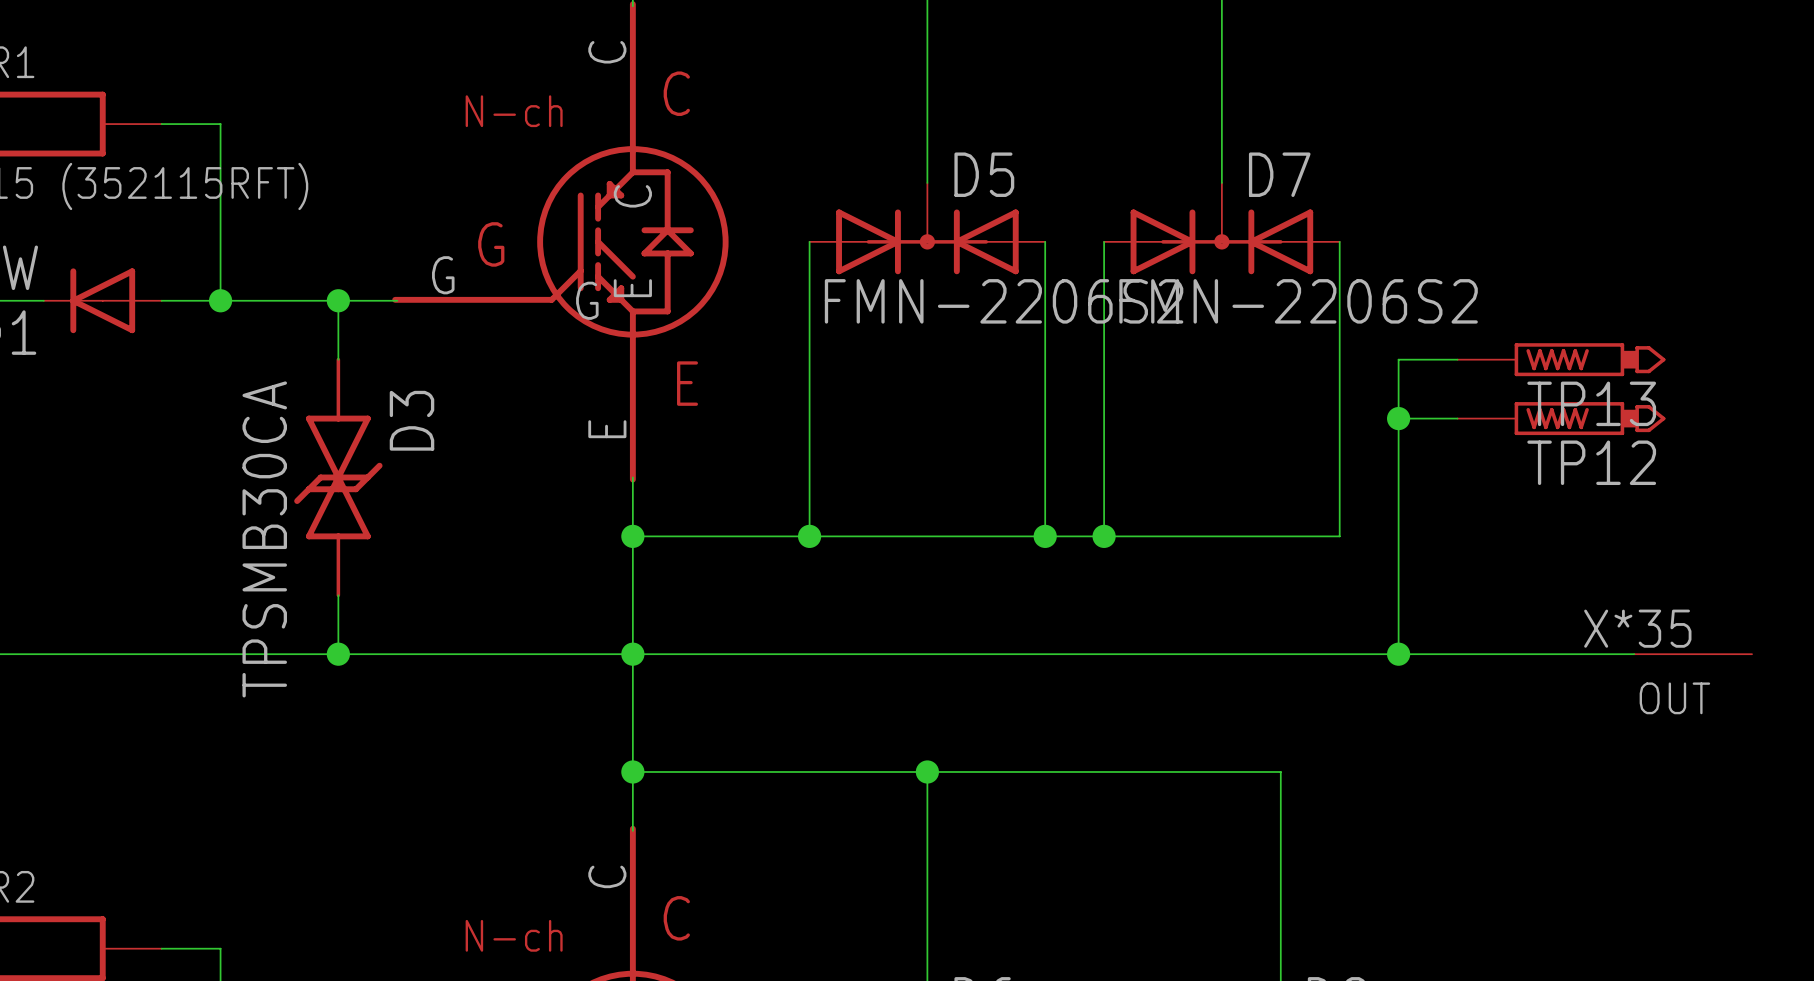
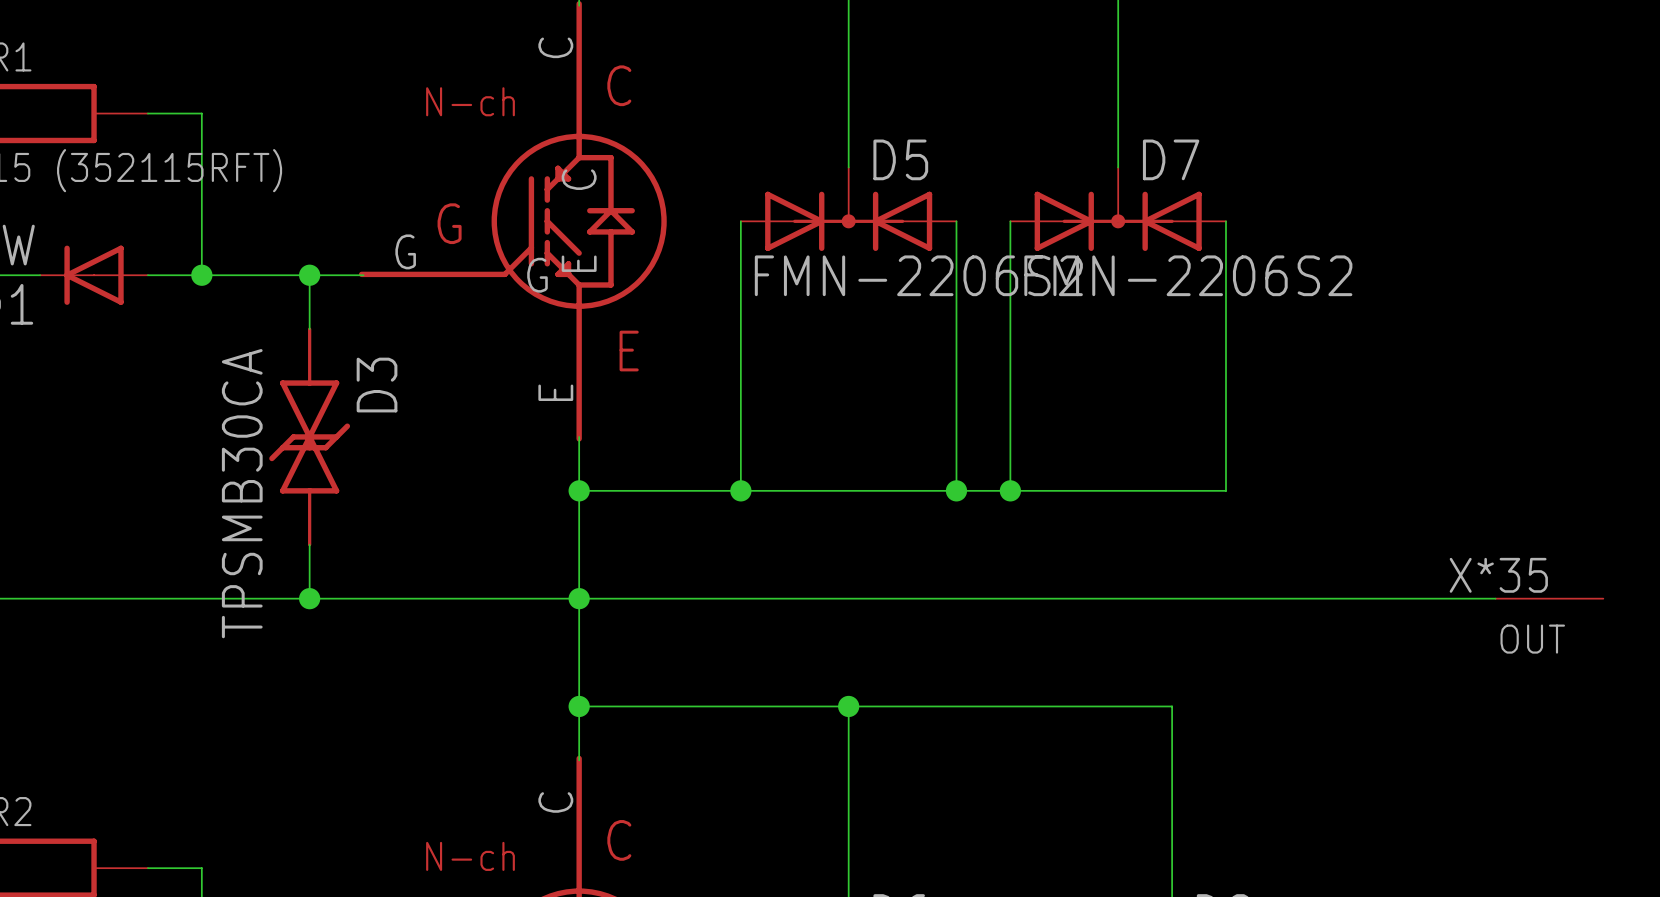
wire: (1457, 359) (1398, 359) (1398, 654) -> none
TP13: (1561, 359) -> none
wire: (1398, 418) (1457, 418) -> none
junction: (1398, 418) -> none
TP12: (1561, 418) -> none
junction: (1398, 654) -> none

